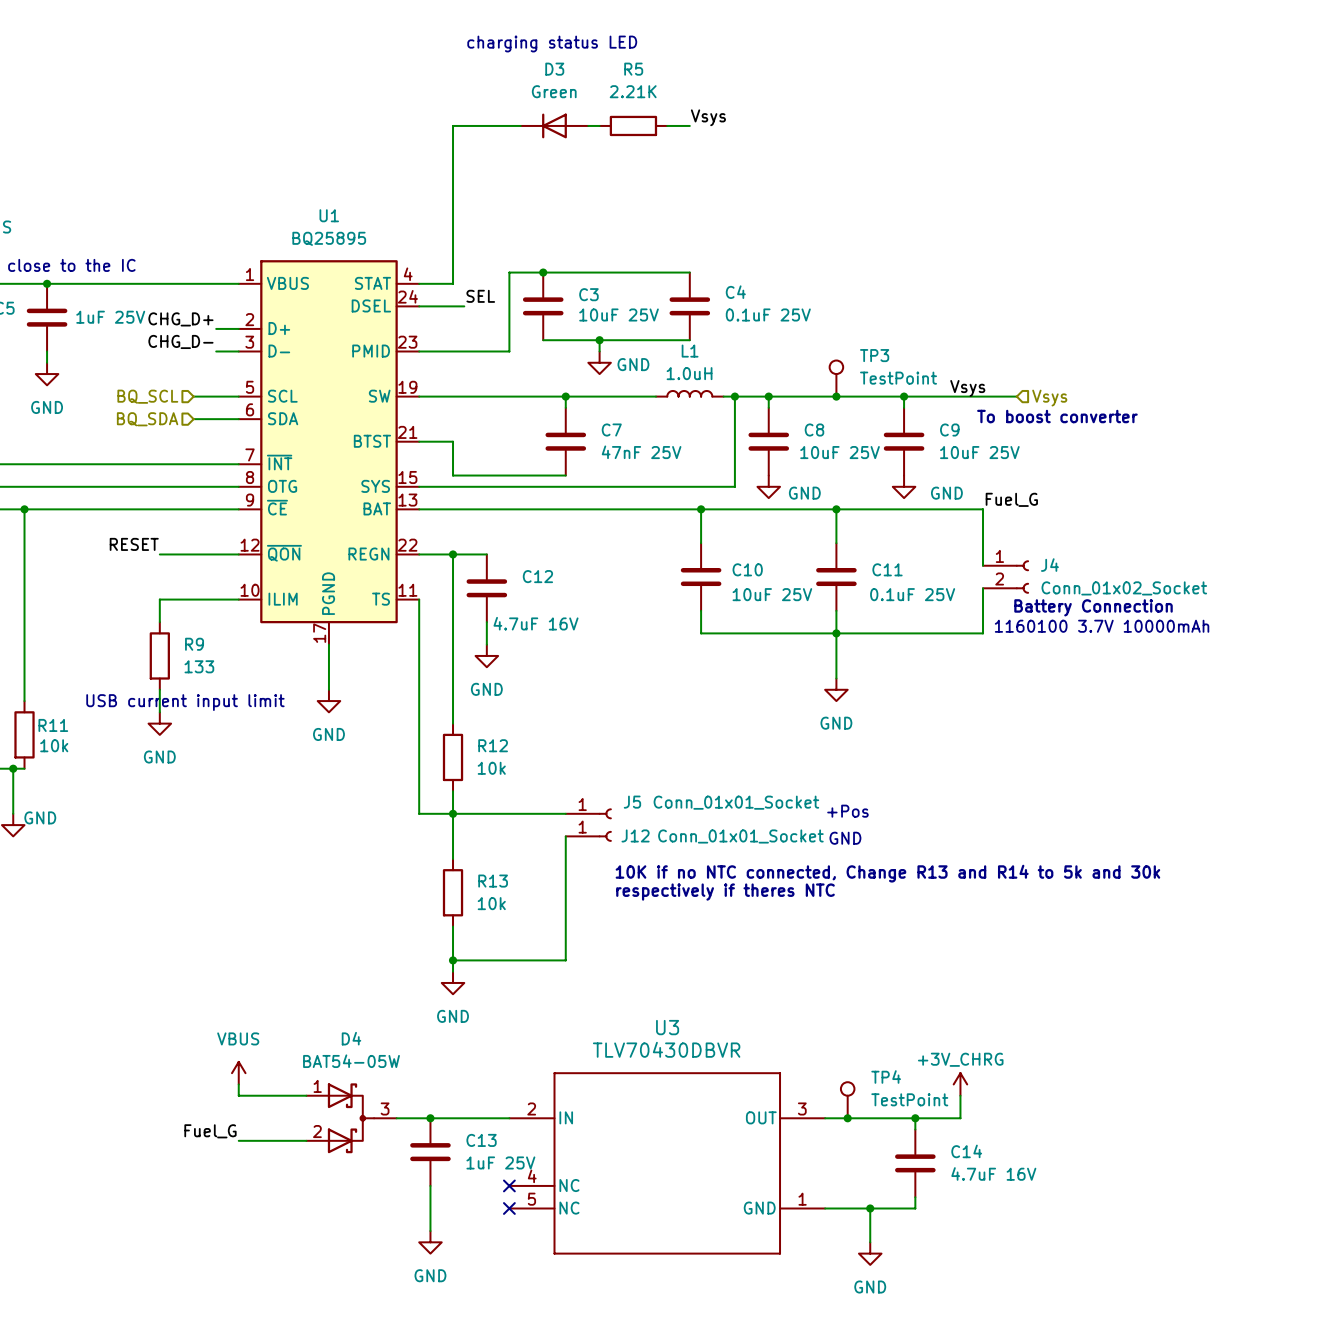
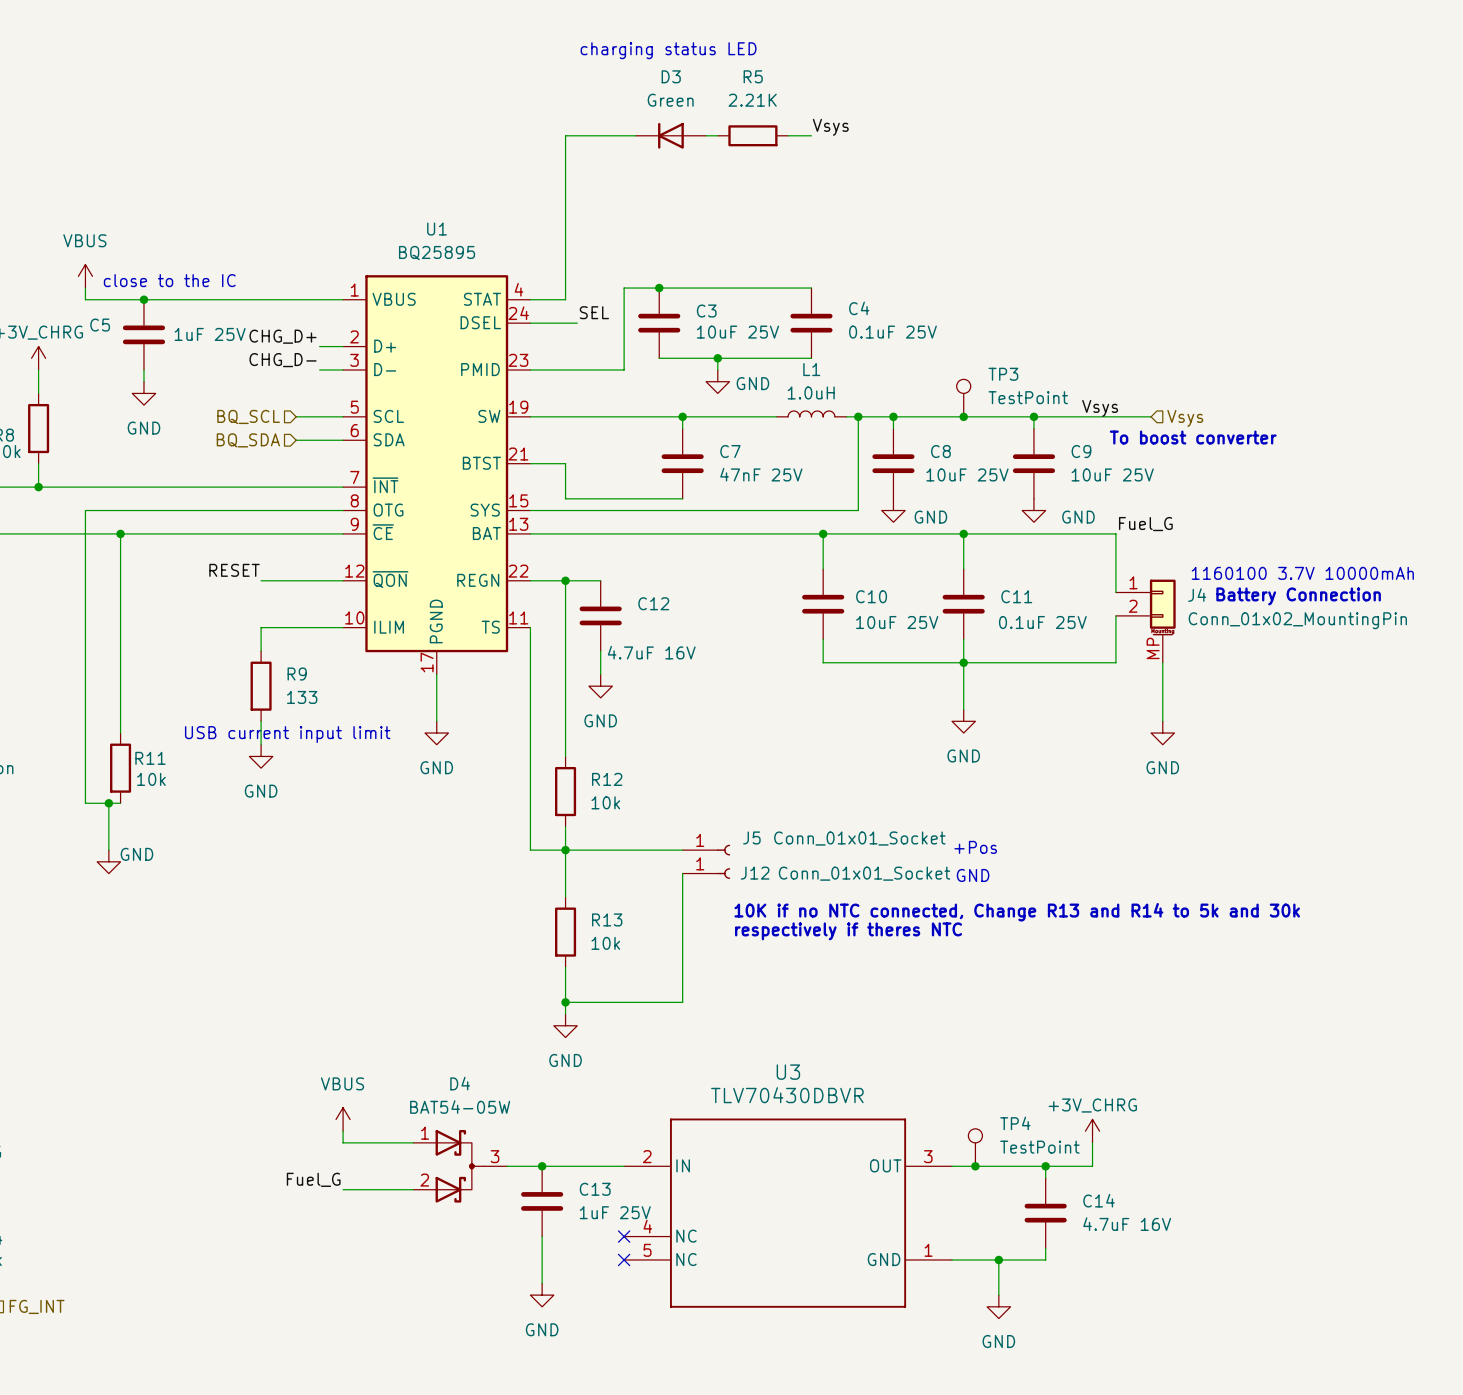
J4 symbol: [983, 560, 1029, 594] -> [1115, 579, 1176, 663]
J4 value: Conn_01x02_Socket (1124, 588) -> Conn_01x02_MountingPin (1297, 620)
text position: Battery Connection (1093, 607) -> Battery Connection (1298, 596)
text position: 1160100 3.7V 10000mAh (1102, 626) -> 1160100 3.7V 10000mAh (1302, 573)
wire: none -> (1162, 662) (1162, 721)
power symbol: none -> GND (1162, 733)

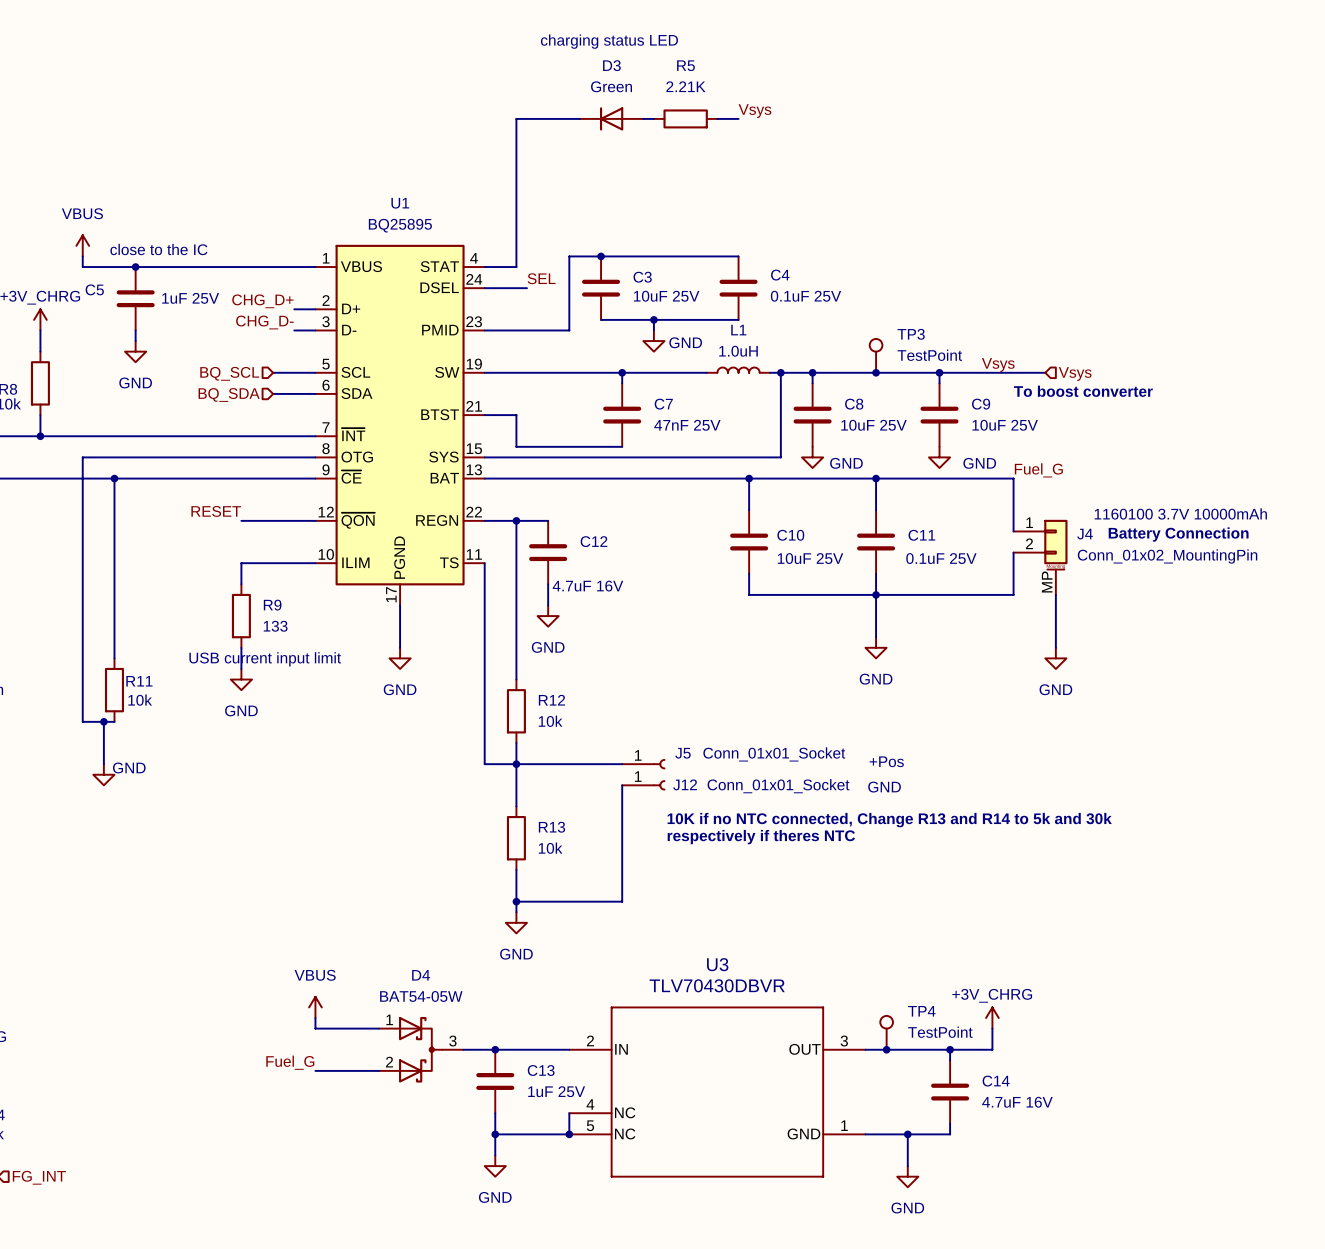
wire: none -> (569, 1113) (569, 1134) (495, 1134)
no-connect mark: (624, 1236) -> none
junction: none -> (495, 1134)
no-connect mark: (624, 1259) -> none
junction: none -> (569, 1134)

